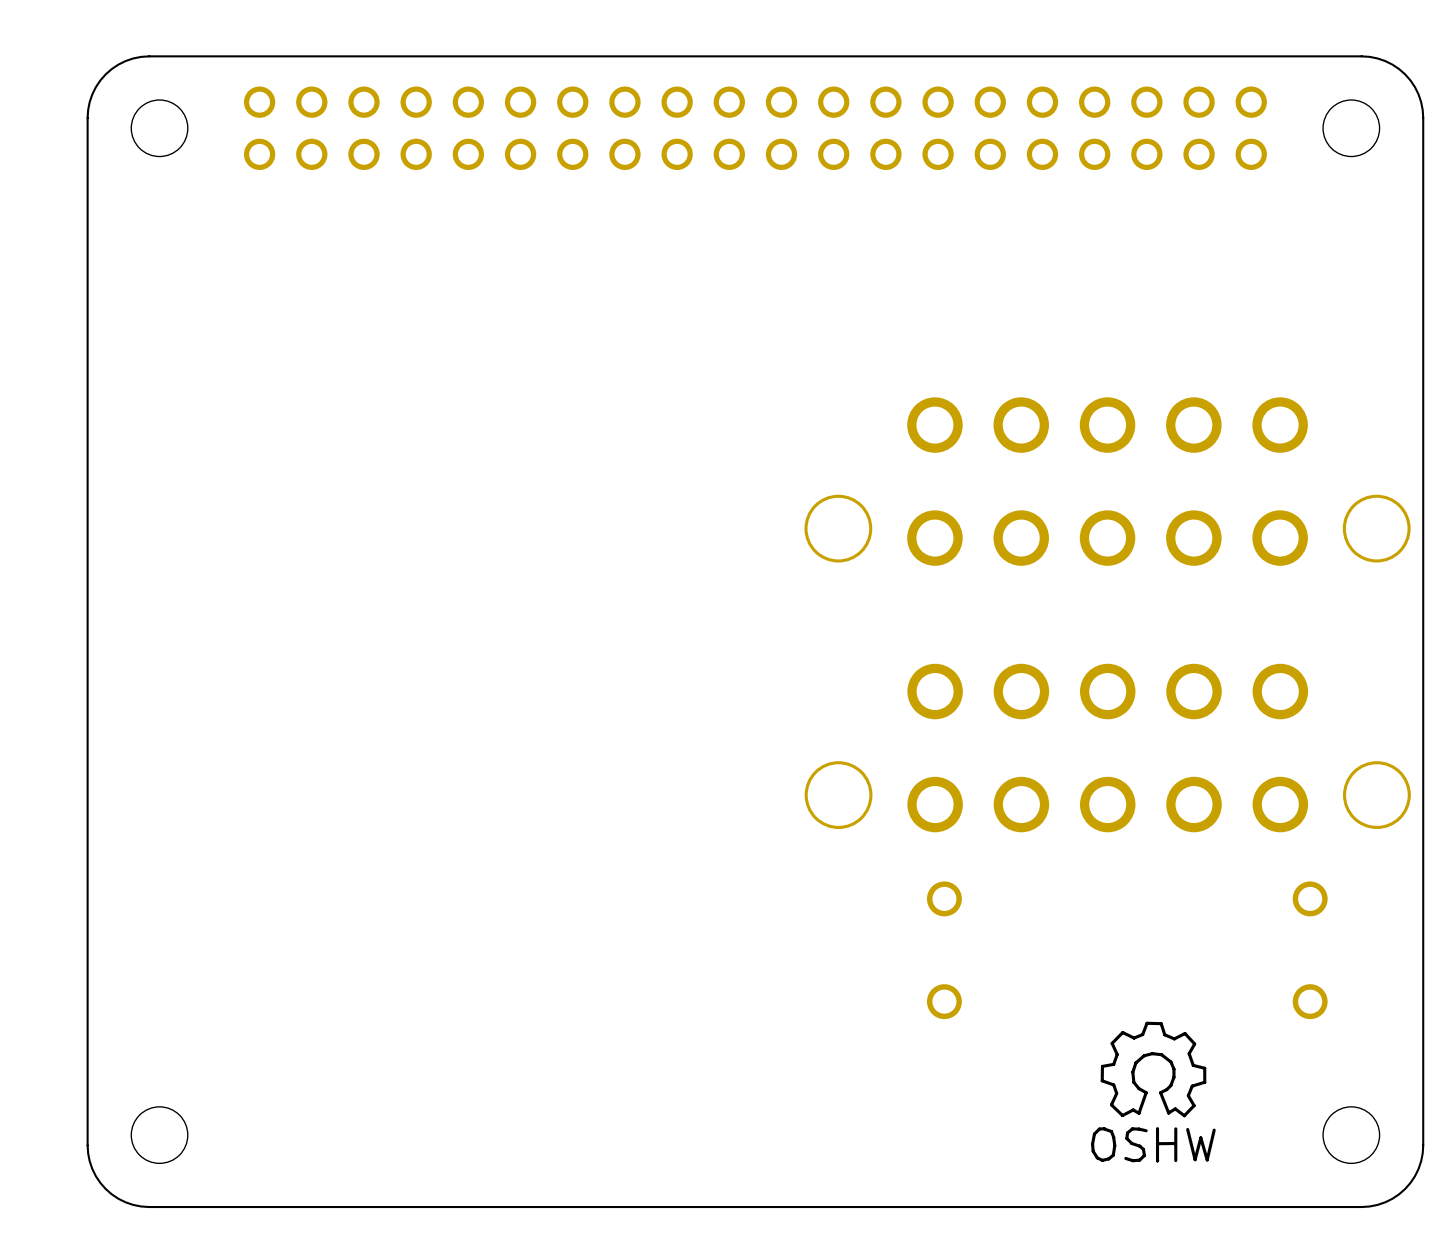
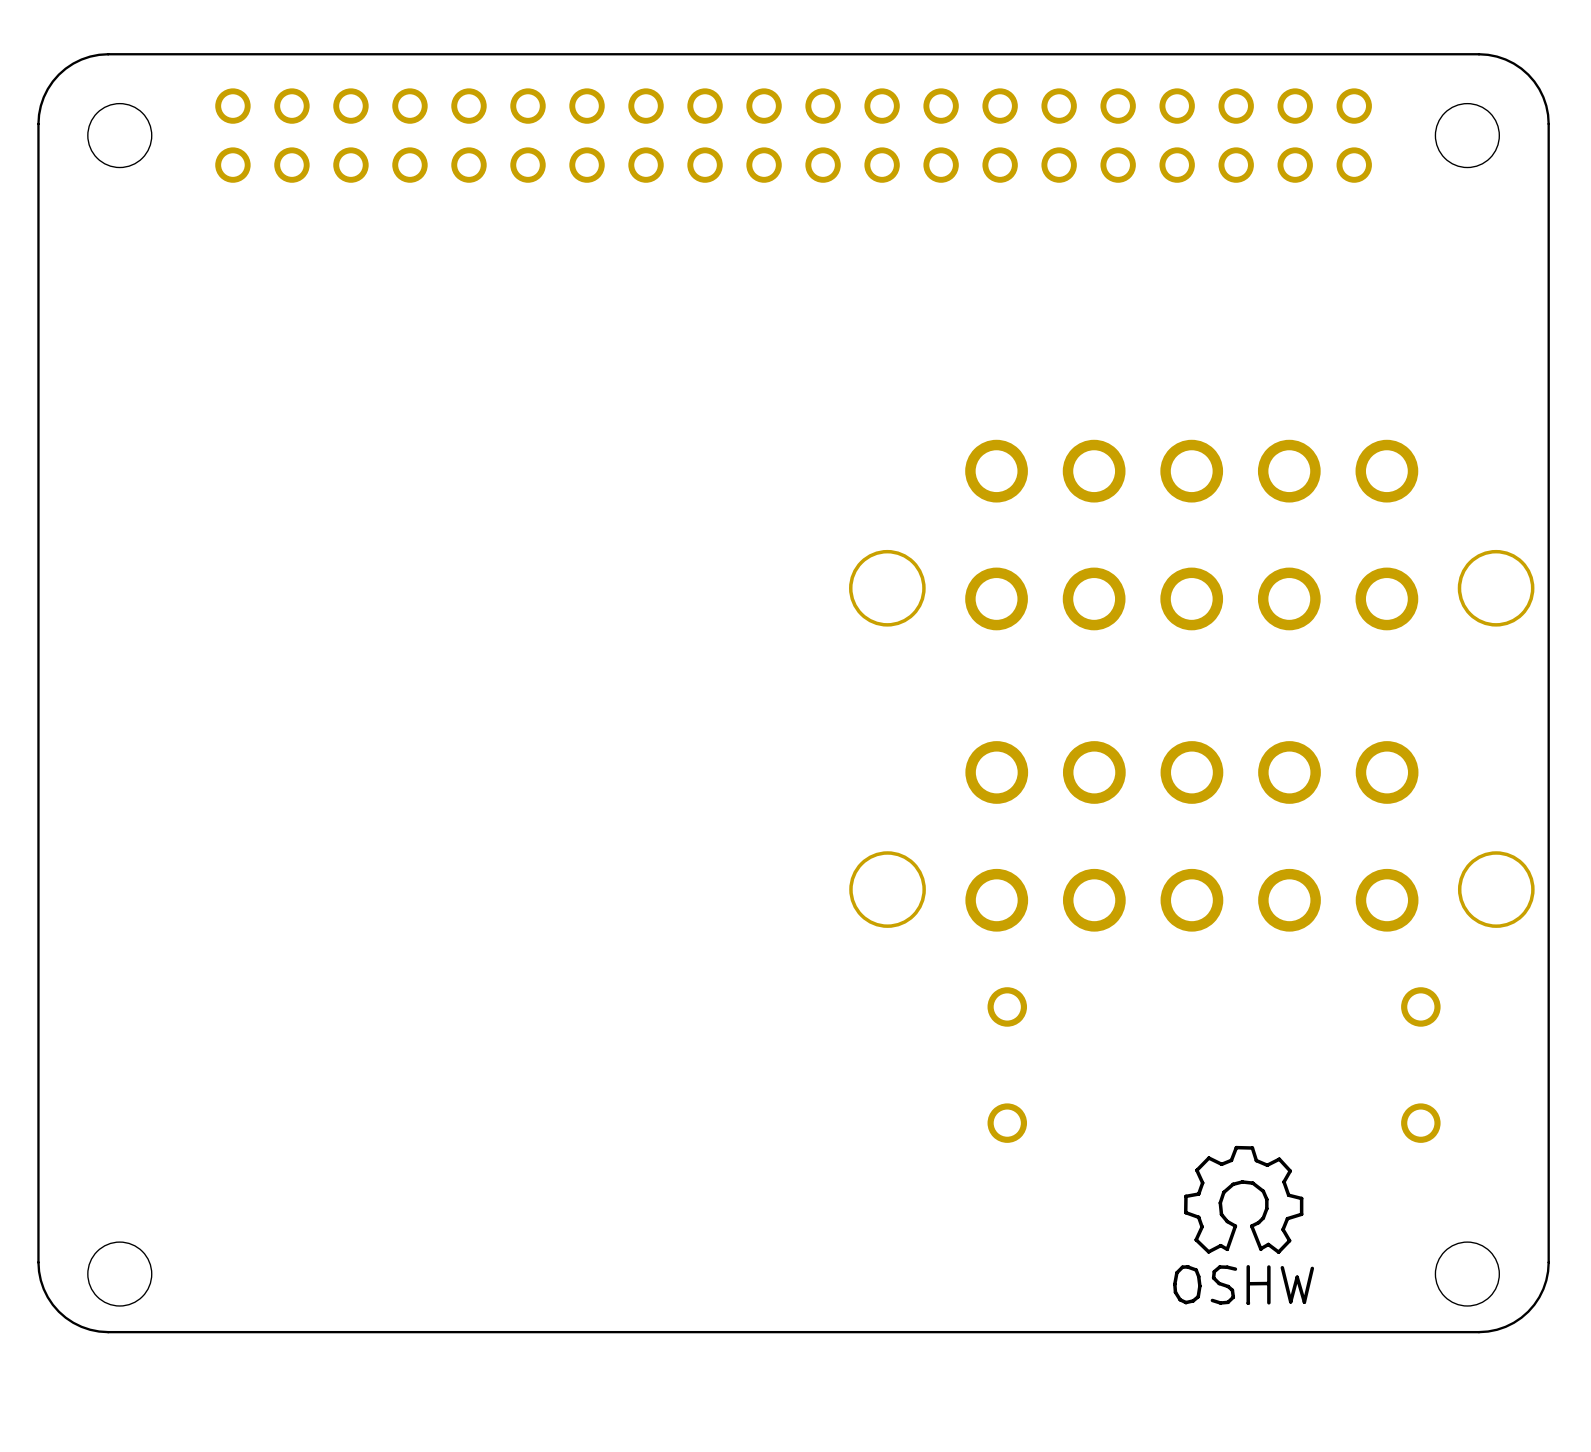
board edge: (1423, 1124) (1421, 1161) (1410, 1182) (1399, 1194) (1385, 1202) (1361, 1207) (149, 1207) (125, 1202) (111, 1194) (100, 1182) (89, 1161) (87, 1124) -> (1548, 1262) (1543, 1289) (1528, 1311) (1505, 1326) (1478, 1332) (108, 1332) (81, 1326) (58, 1311) (43, 1289) (38, 1262)

